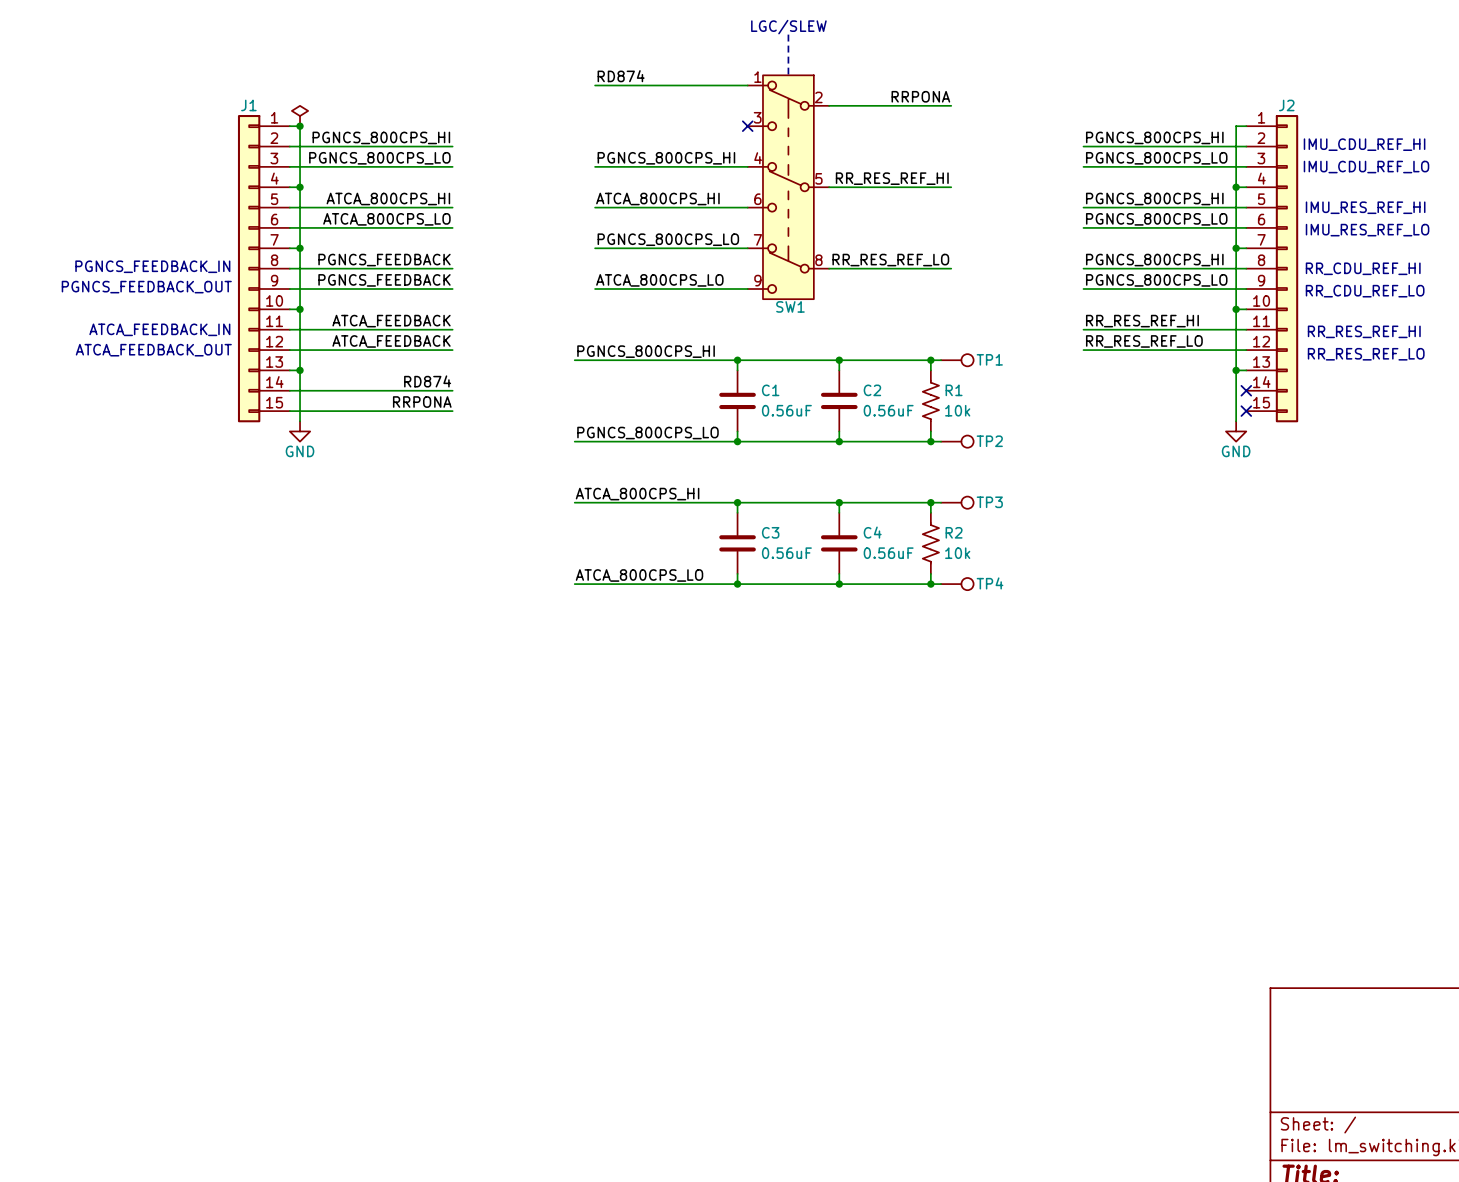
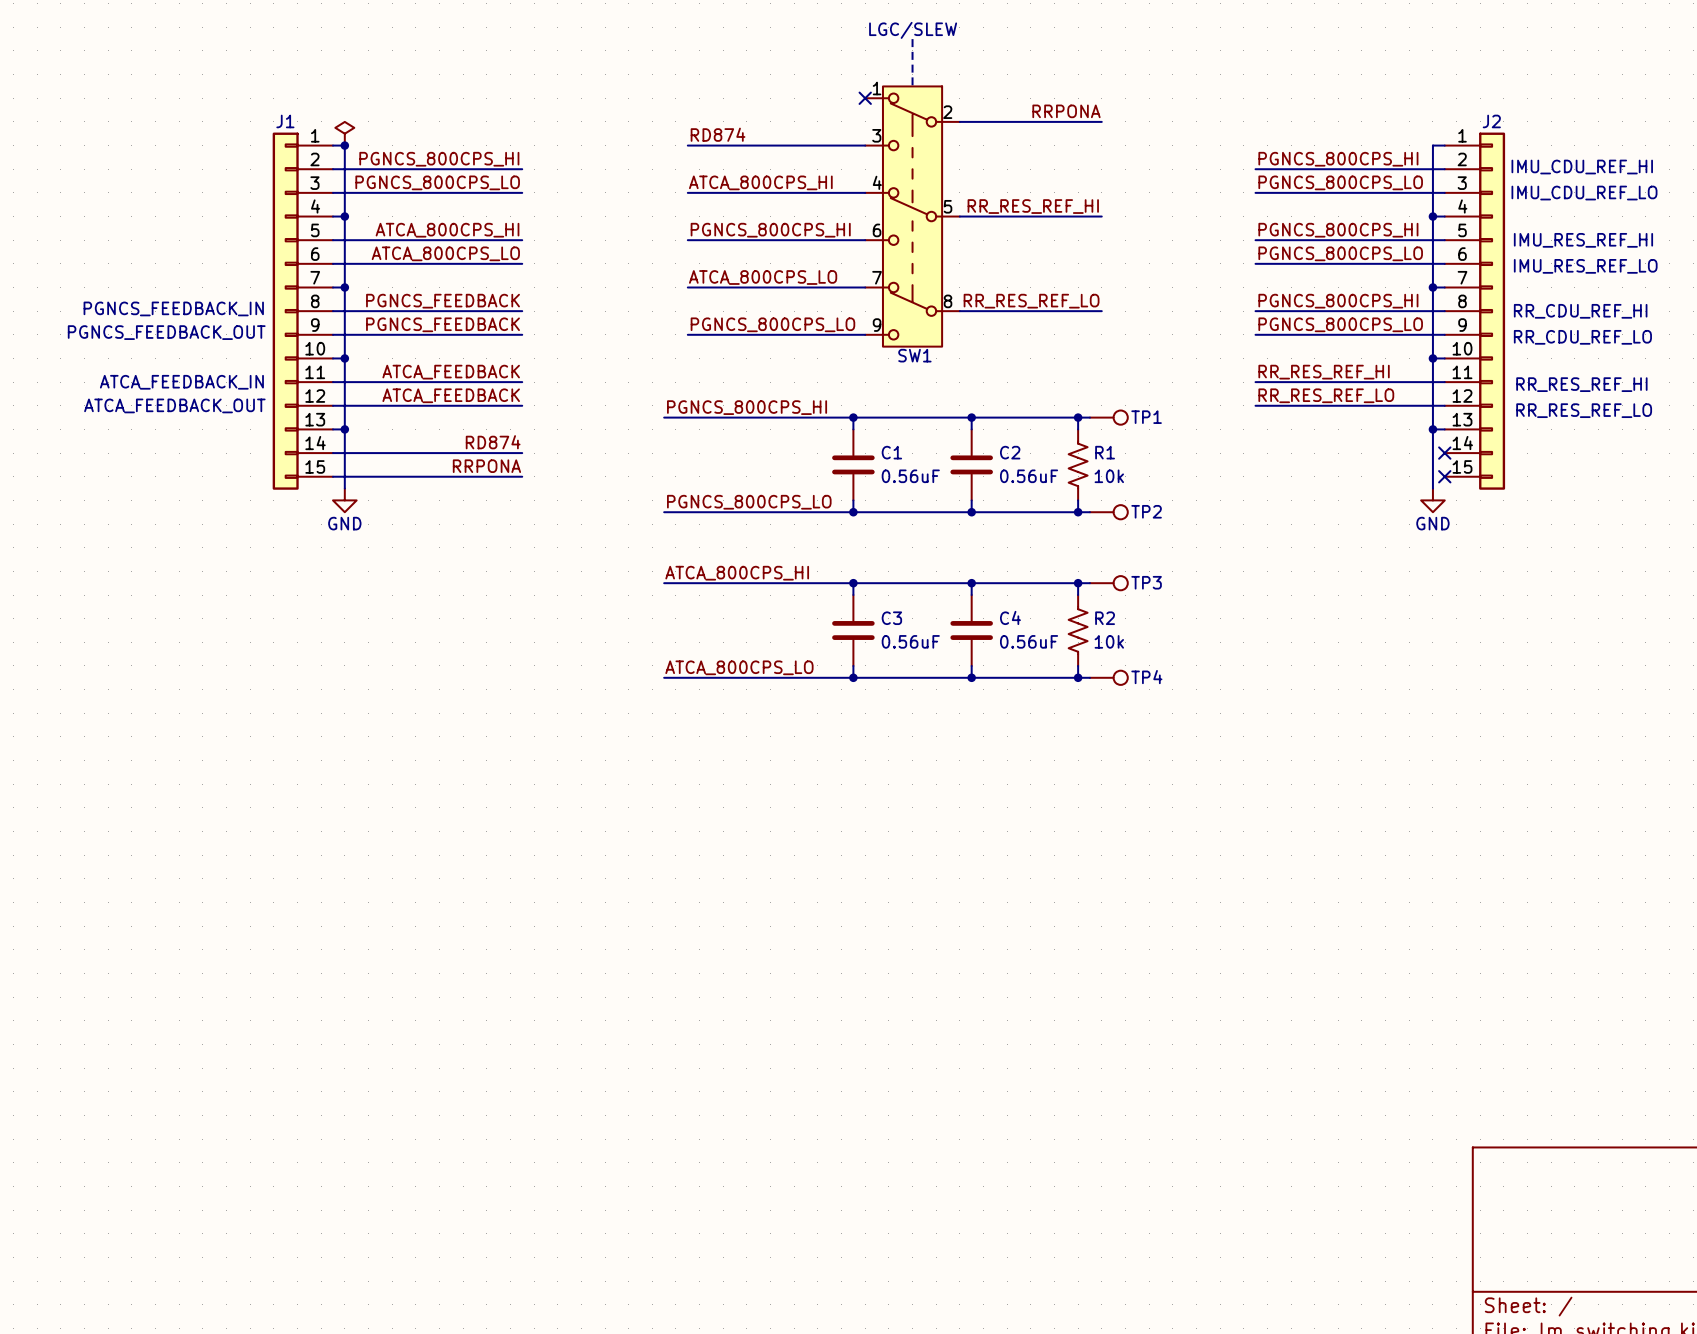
label position: RD874 (621, 76) -> RD874 (718, 134)
wire: (595, 85) (747, 85) -> (687, 145) (865, 145)
no-connect mark position: (747, 126) -> (865, 98)
label: PGNCS_800CPS_HI (666, 158) -> ATCA_800CPS_HI (760, 182)
label: ATCA_800CPS_HI (657, 199) -> PGNCS_800CPS_HI (770, 230)
label: PGNCS_800CPS_LO (668, 239) -> ATCA_800CPS_LO (763, 277)
label: ATCA_800CPS_LO (659, 280) -> PGNCS_800CPS_LO (772, 324)

